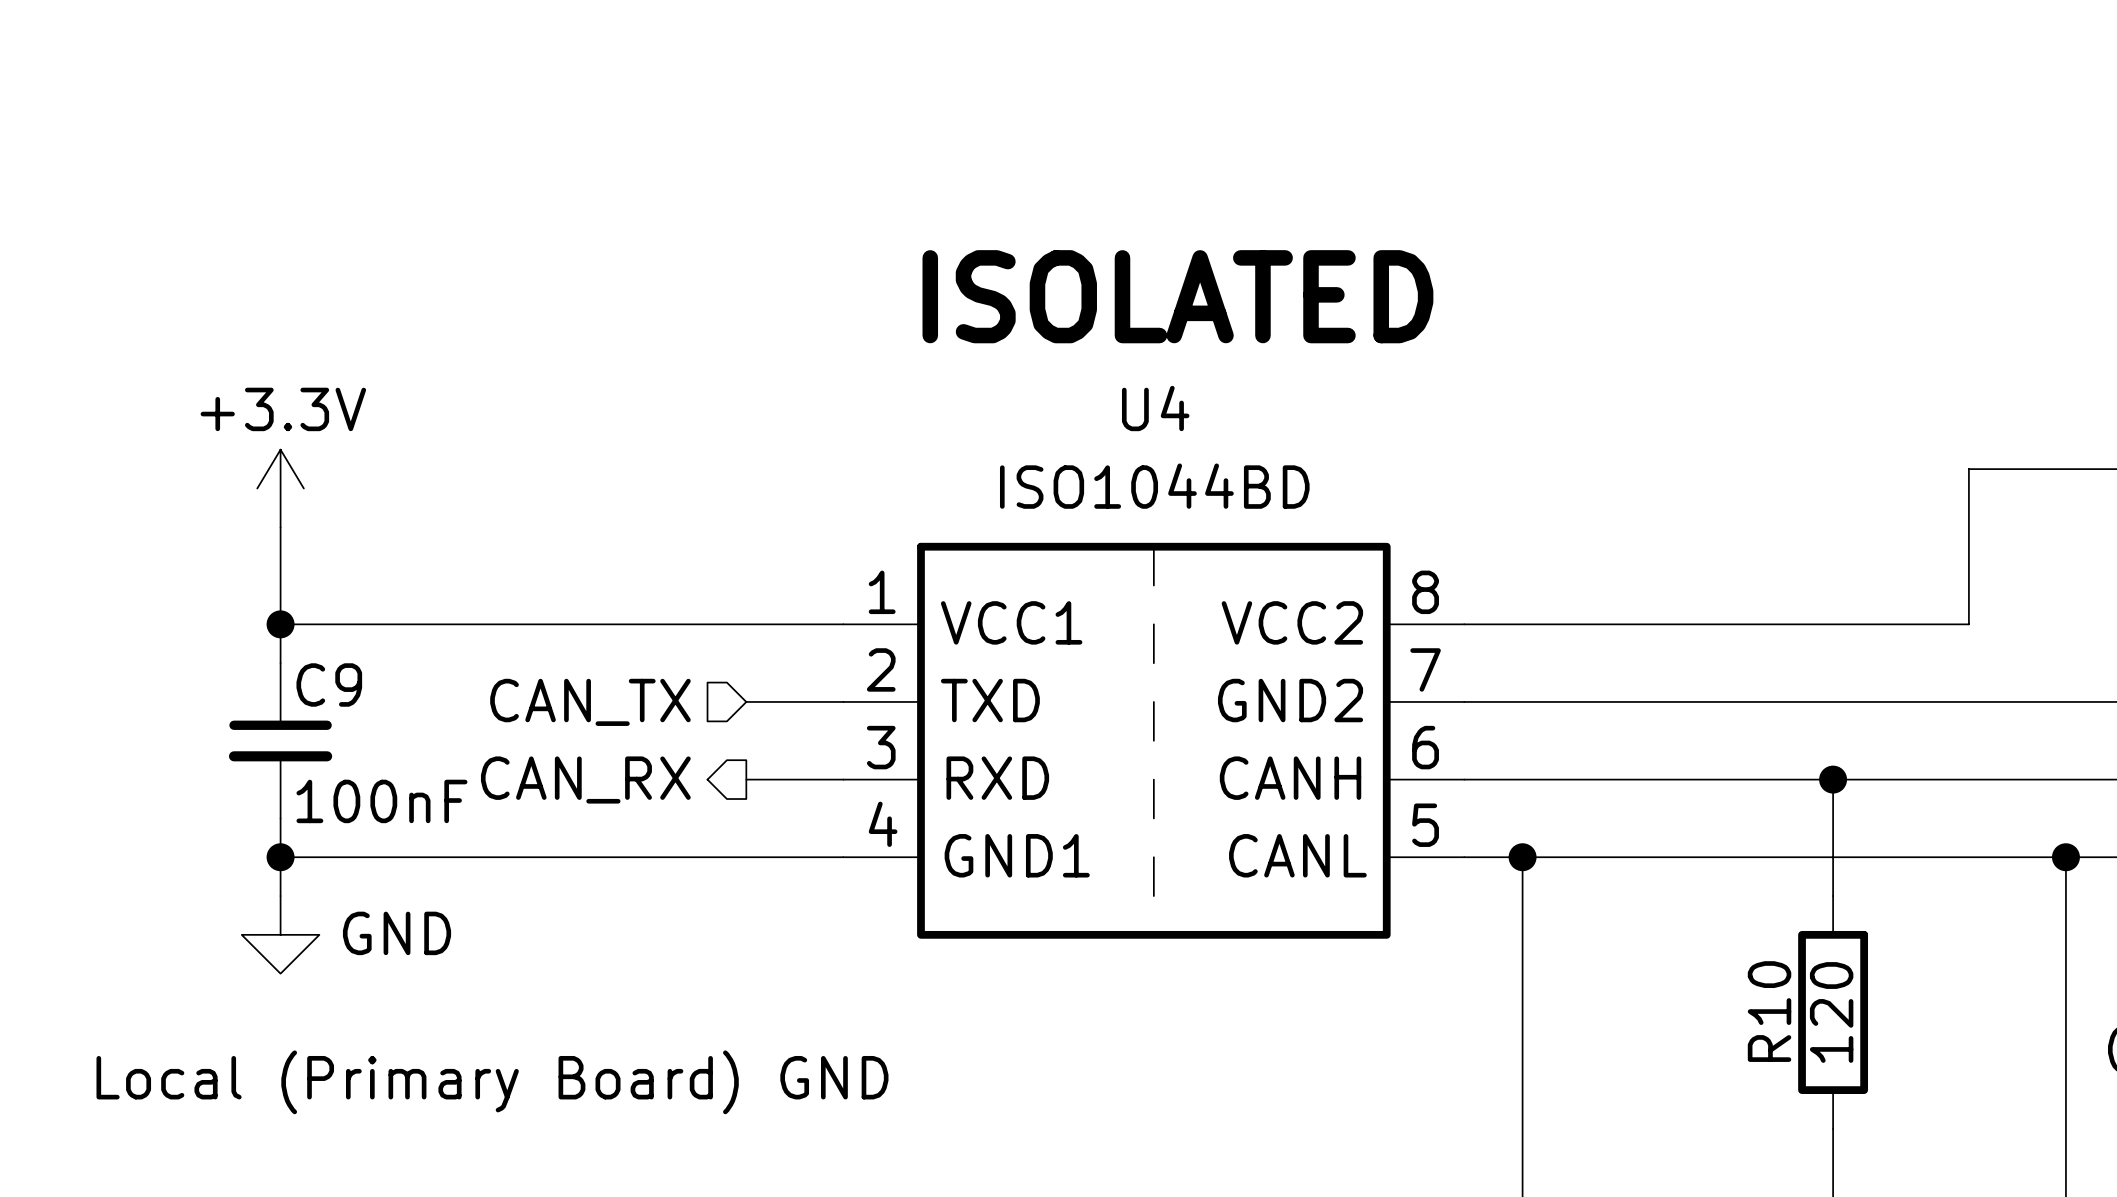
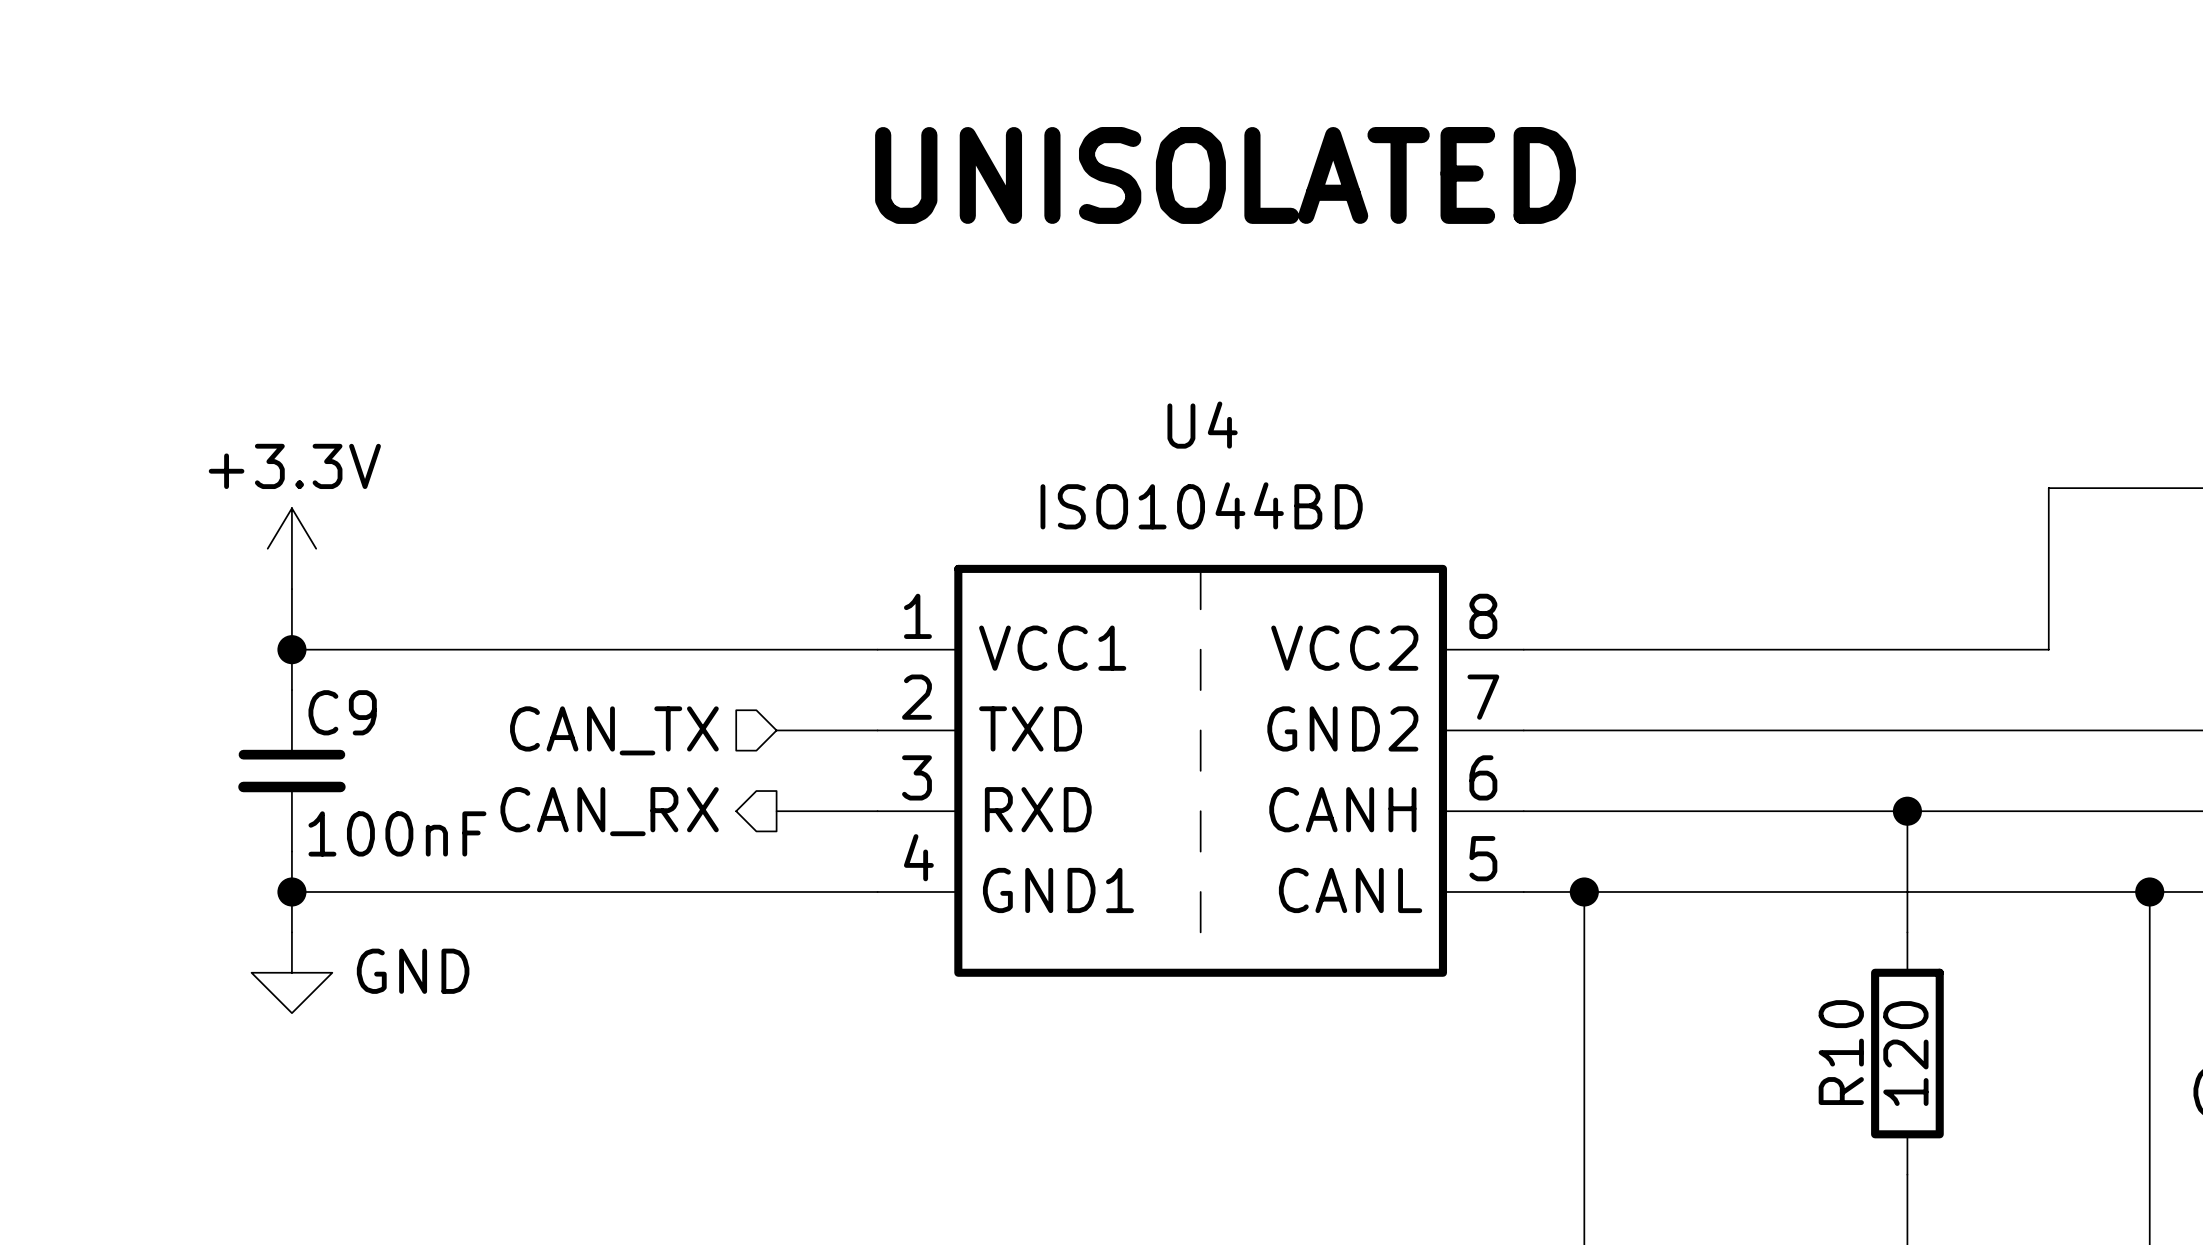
text: ISOLATED (1177, 296) -> UNISOLATED (1225, 175)
power symbol position: +3.3V (280, 488) -> +3.3V (291, 548)
text: Local (Primary Board) GND (492, 1082) -> none

